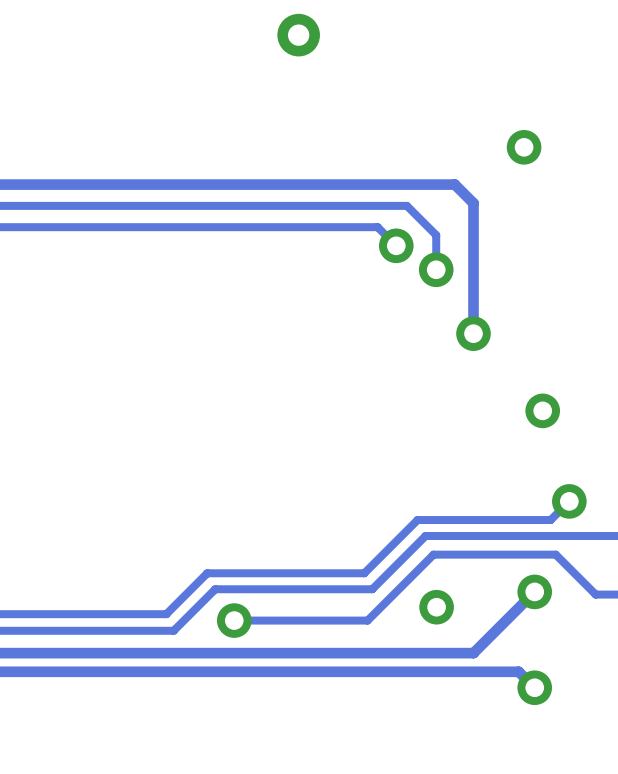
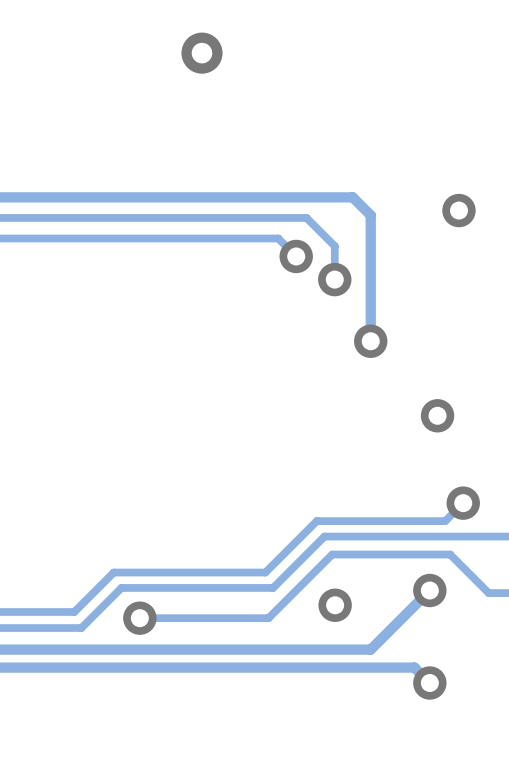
via position: (524, 147) -> (458, 210)

